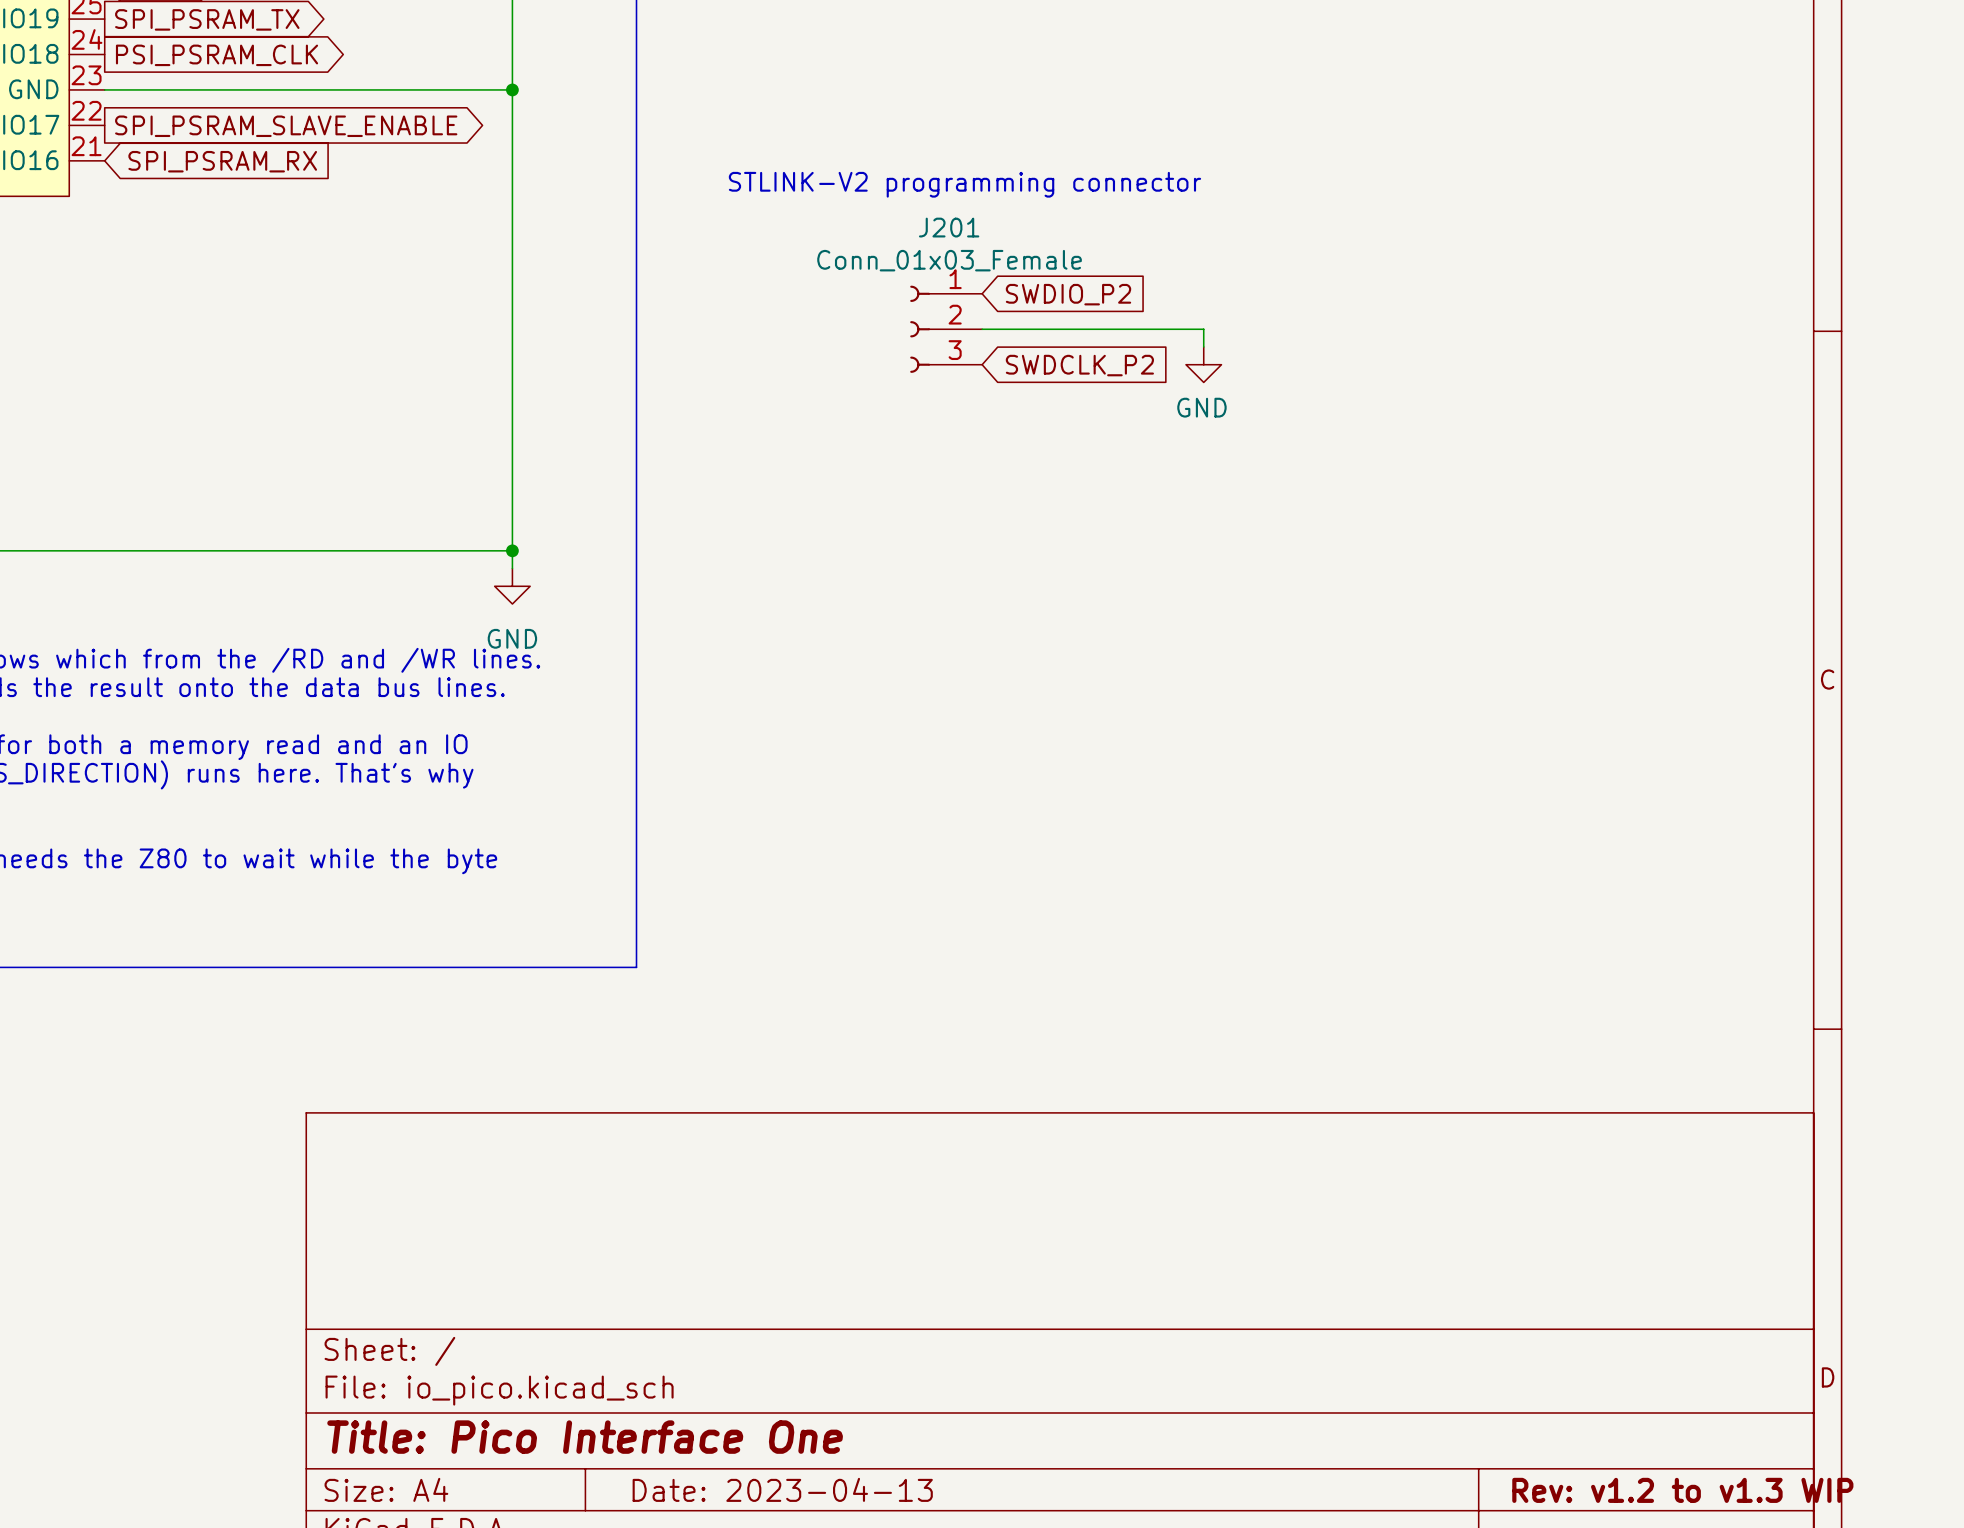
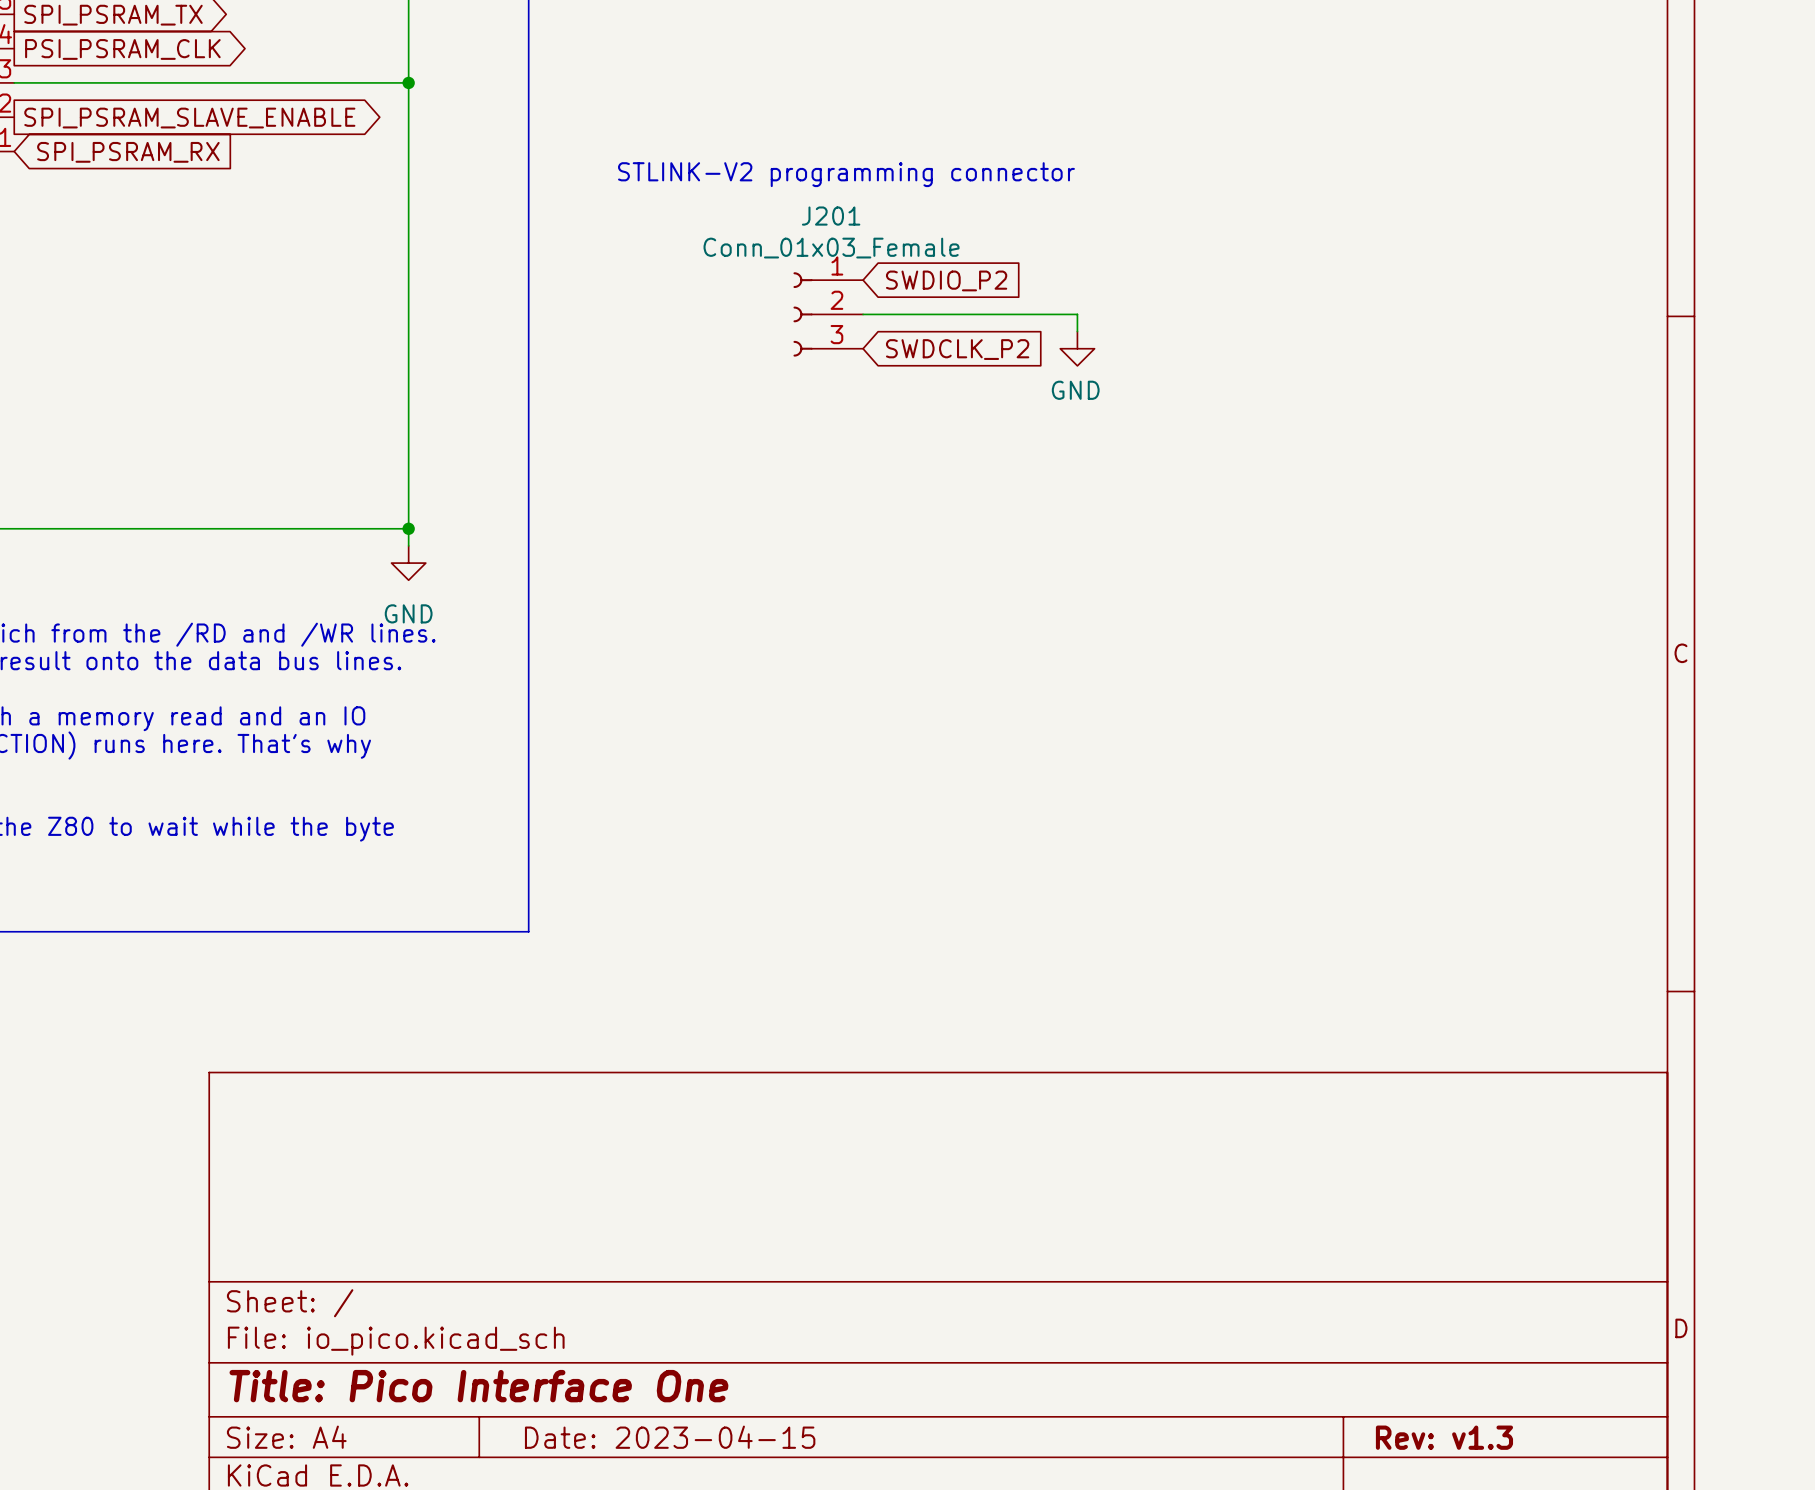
title block: Date: 2023-04-13 (782, 1489) -> Date: 2023-04-15 (670, 1437)
title block: Rev: v1.2 to v1.3 WIP (1682, 1490) -> Rev: v1.3 (1444, 1437)

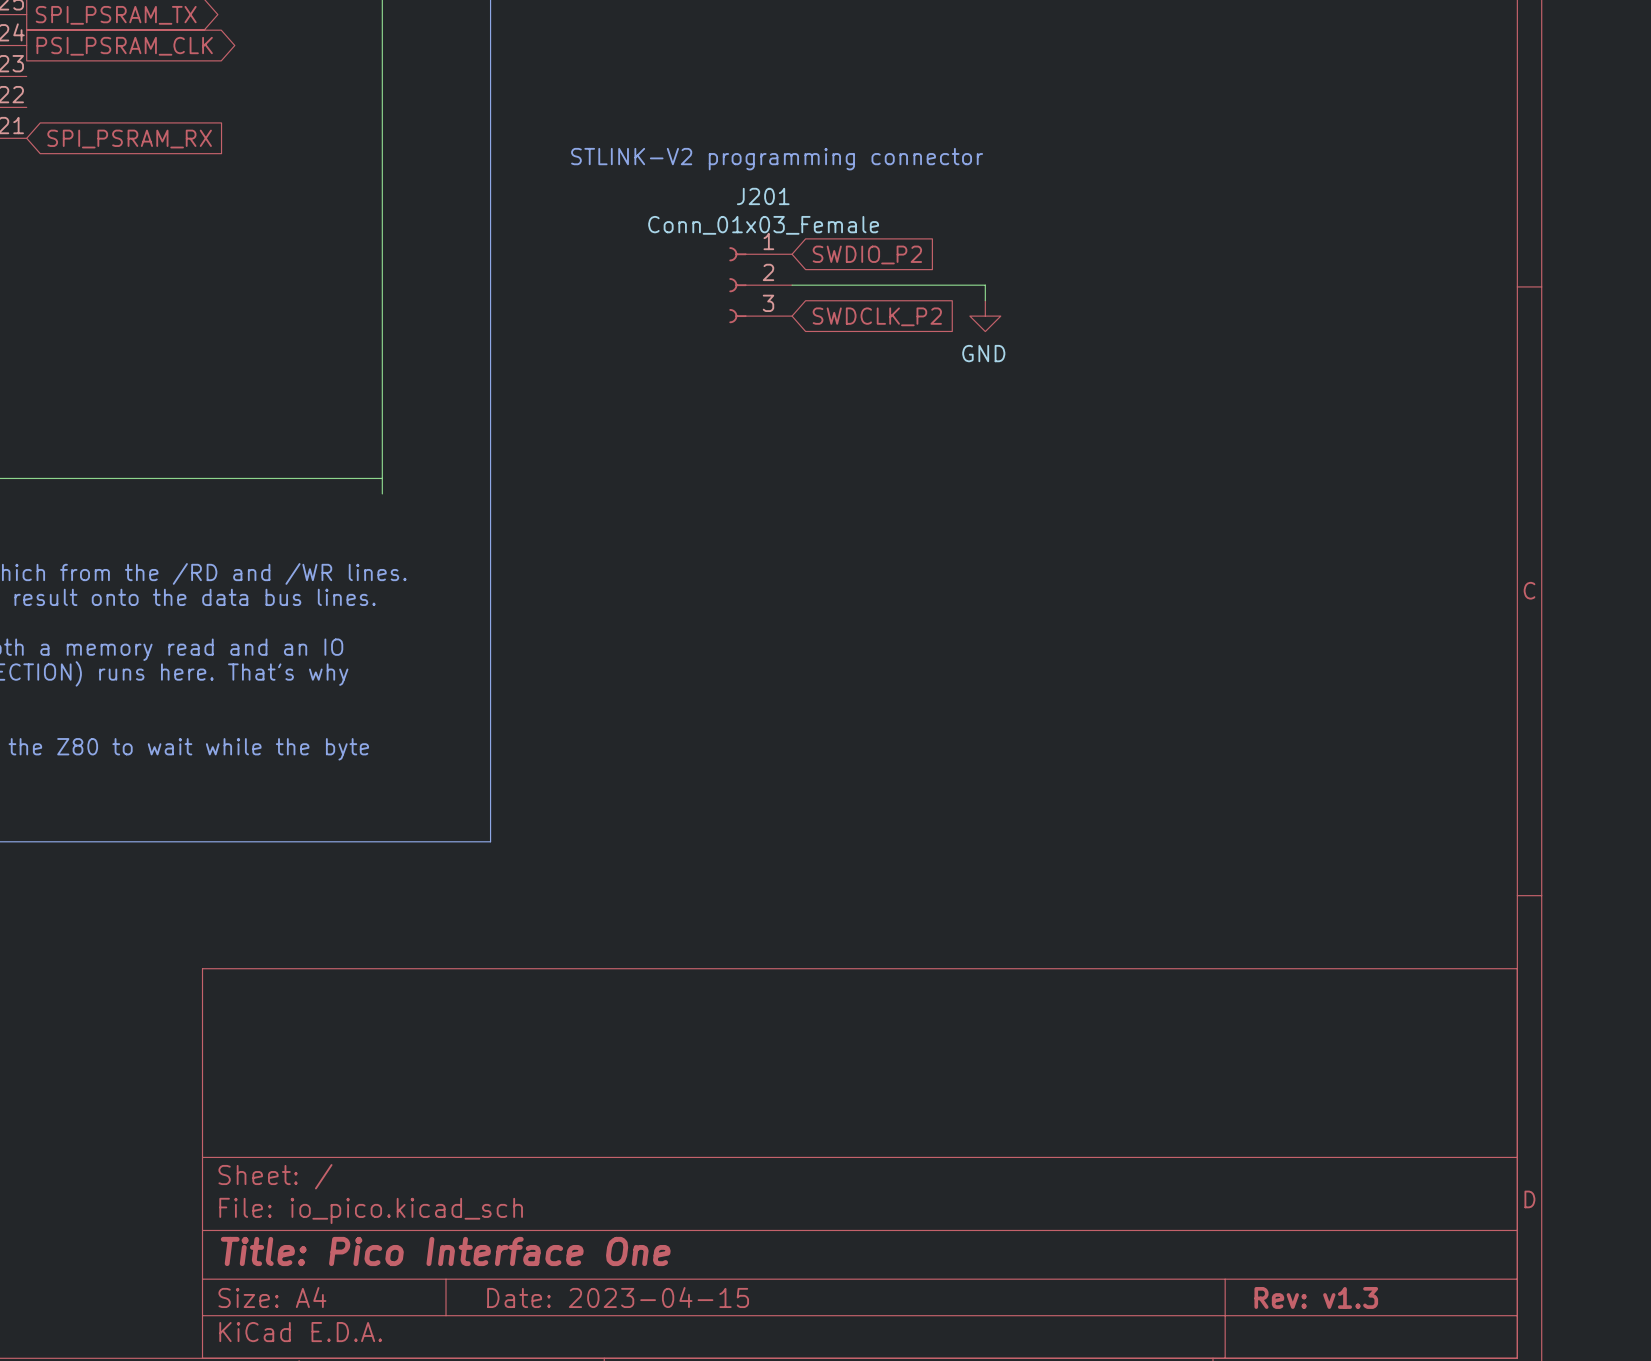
wire: (14, 82) (408, 82) -> none
junction: (408, 82) -> none
global label: SPI_PSRAM_SLAVE_ENABLE (189, 118) -> none
junction: (408, 528) -> none
power symbol: GND (408, 563) -> none

